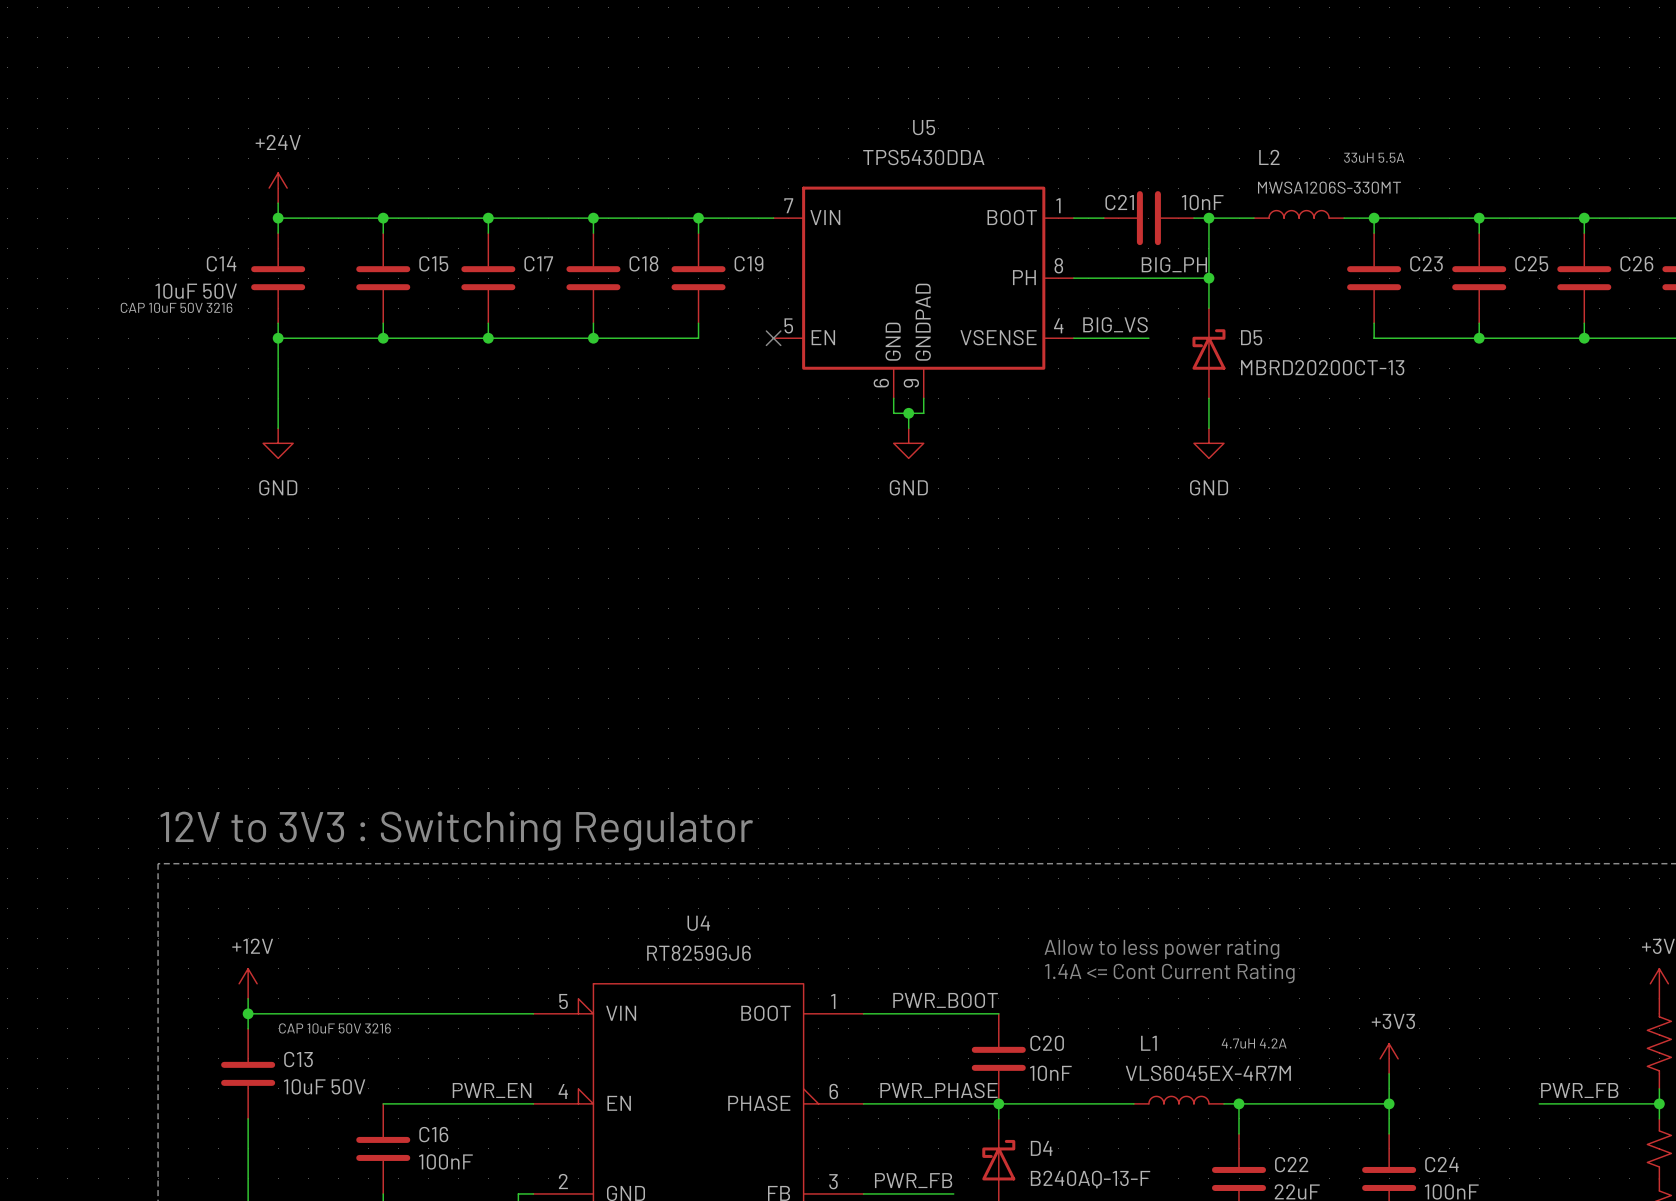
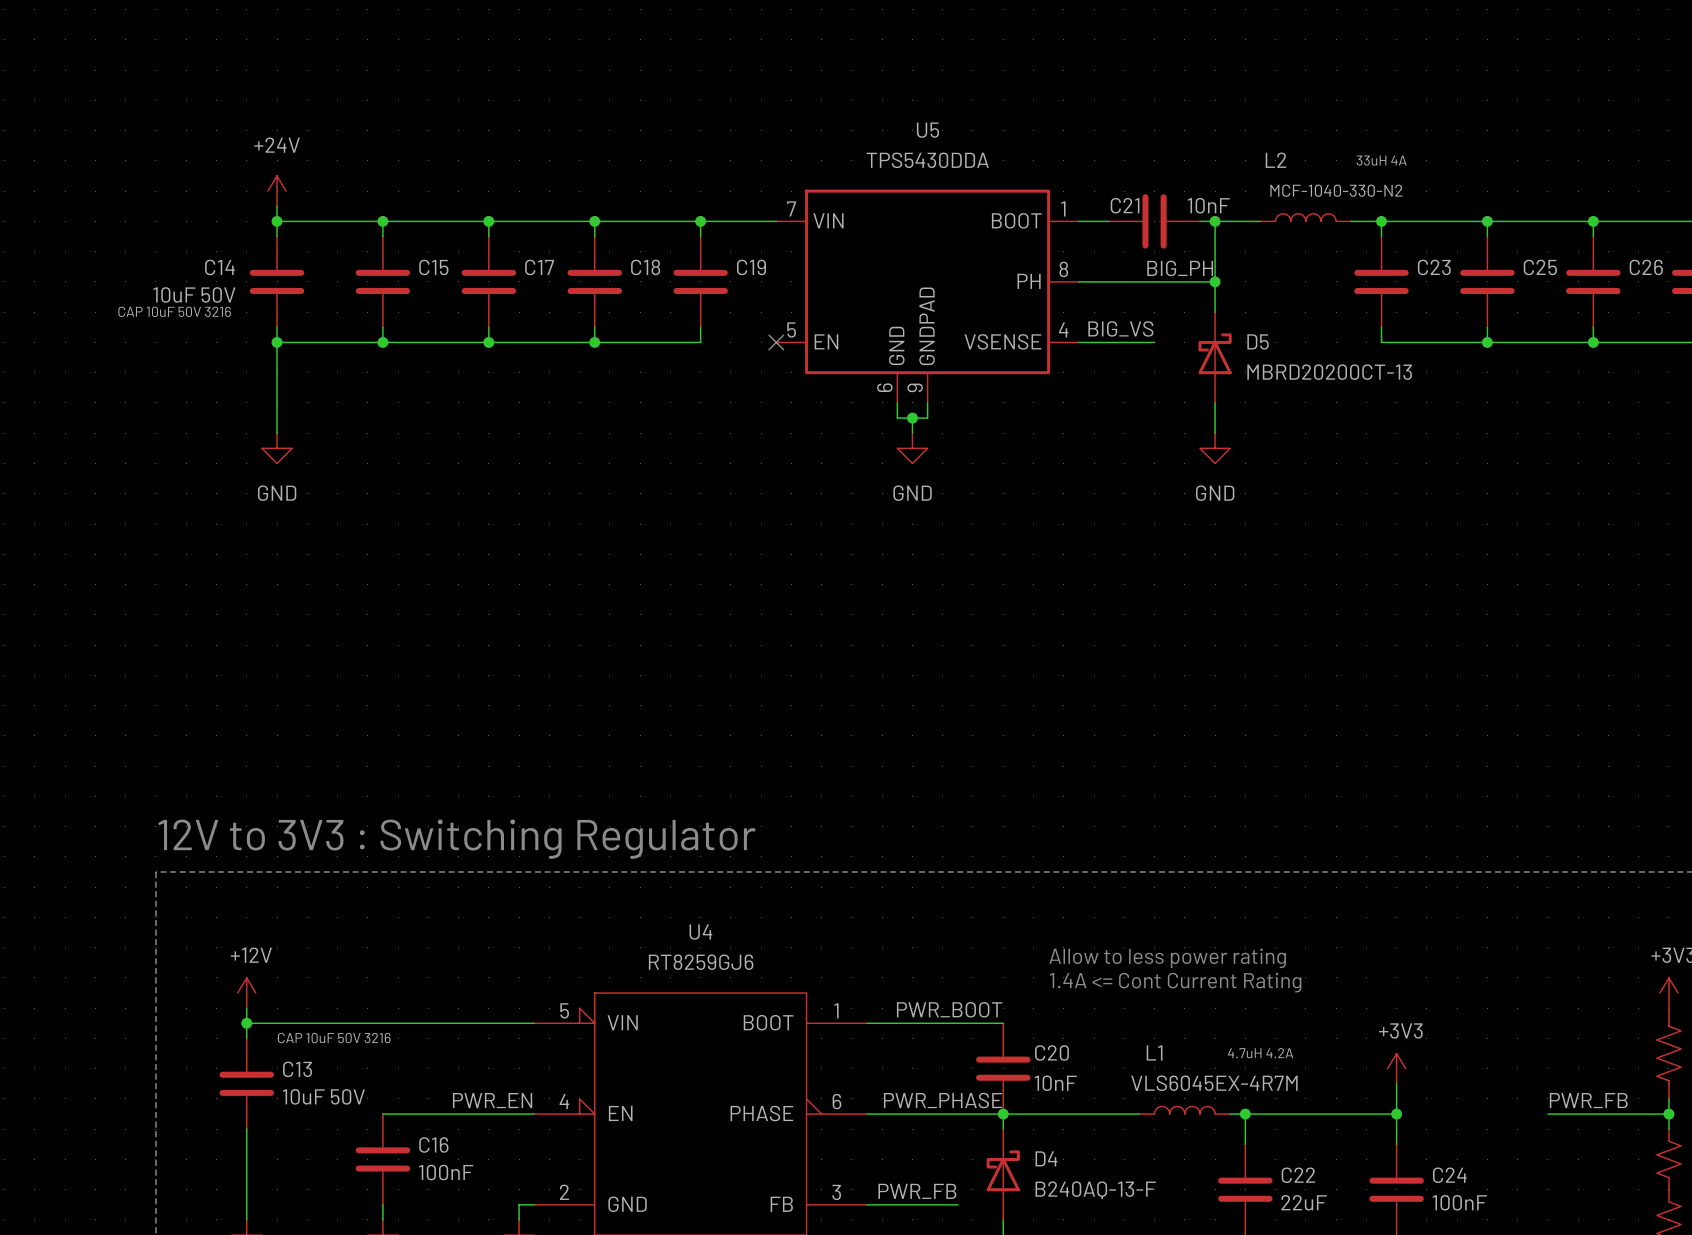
L2 text: 33uH 5.5A (1374, 157) -> 33uH 4A (1381, 160)
L2 value: MWSA1206S-330MT (1329, 187) -> MCF-1040-330-N2 (1336, 190)

